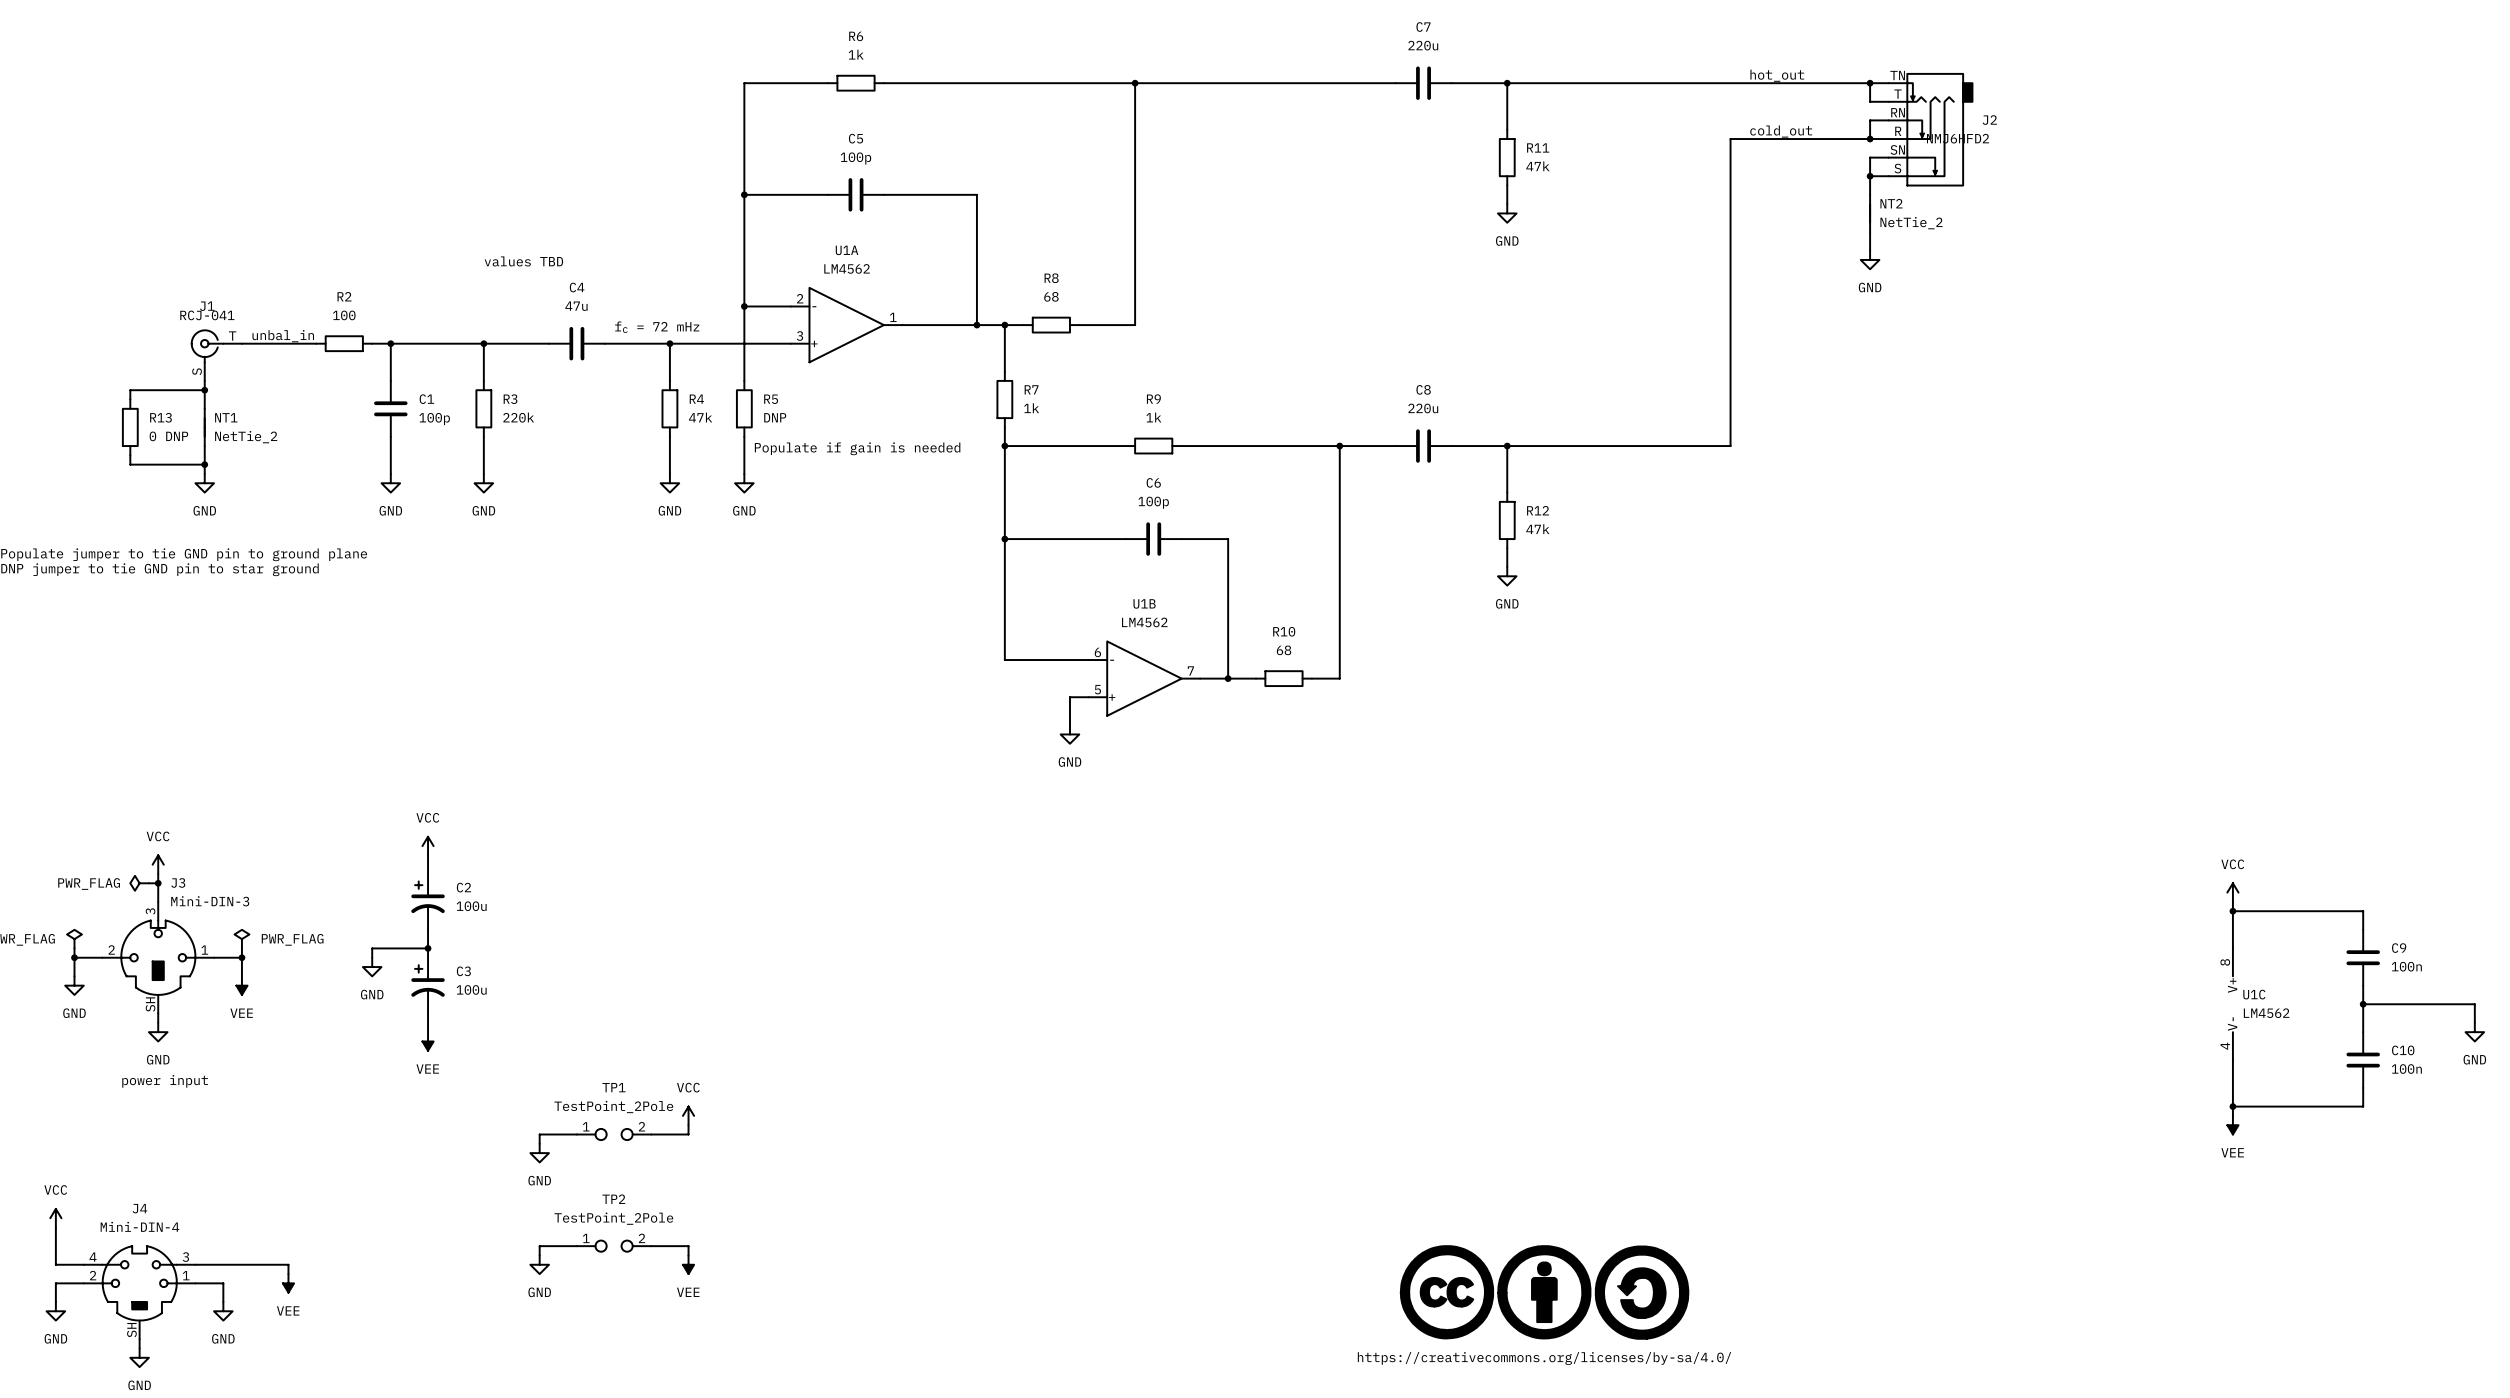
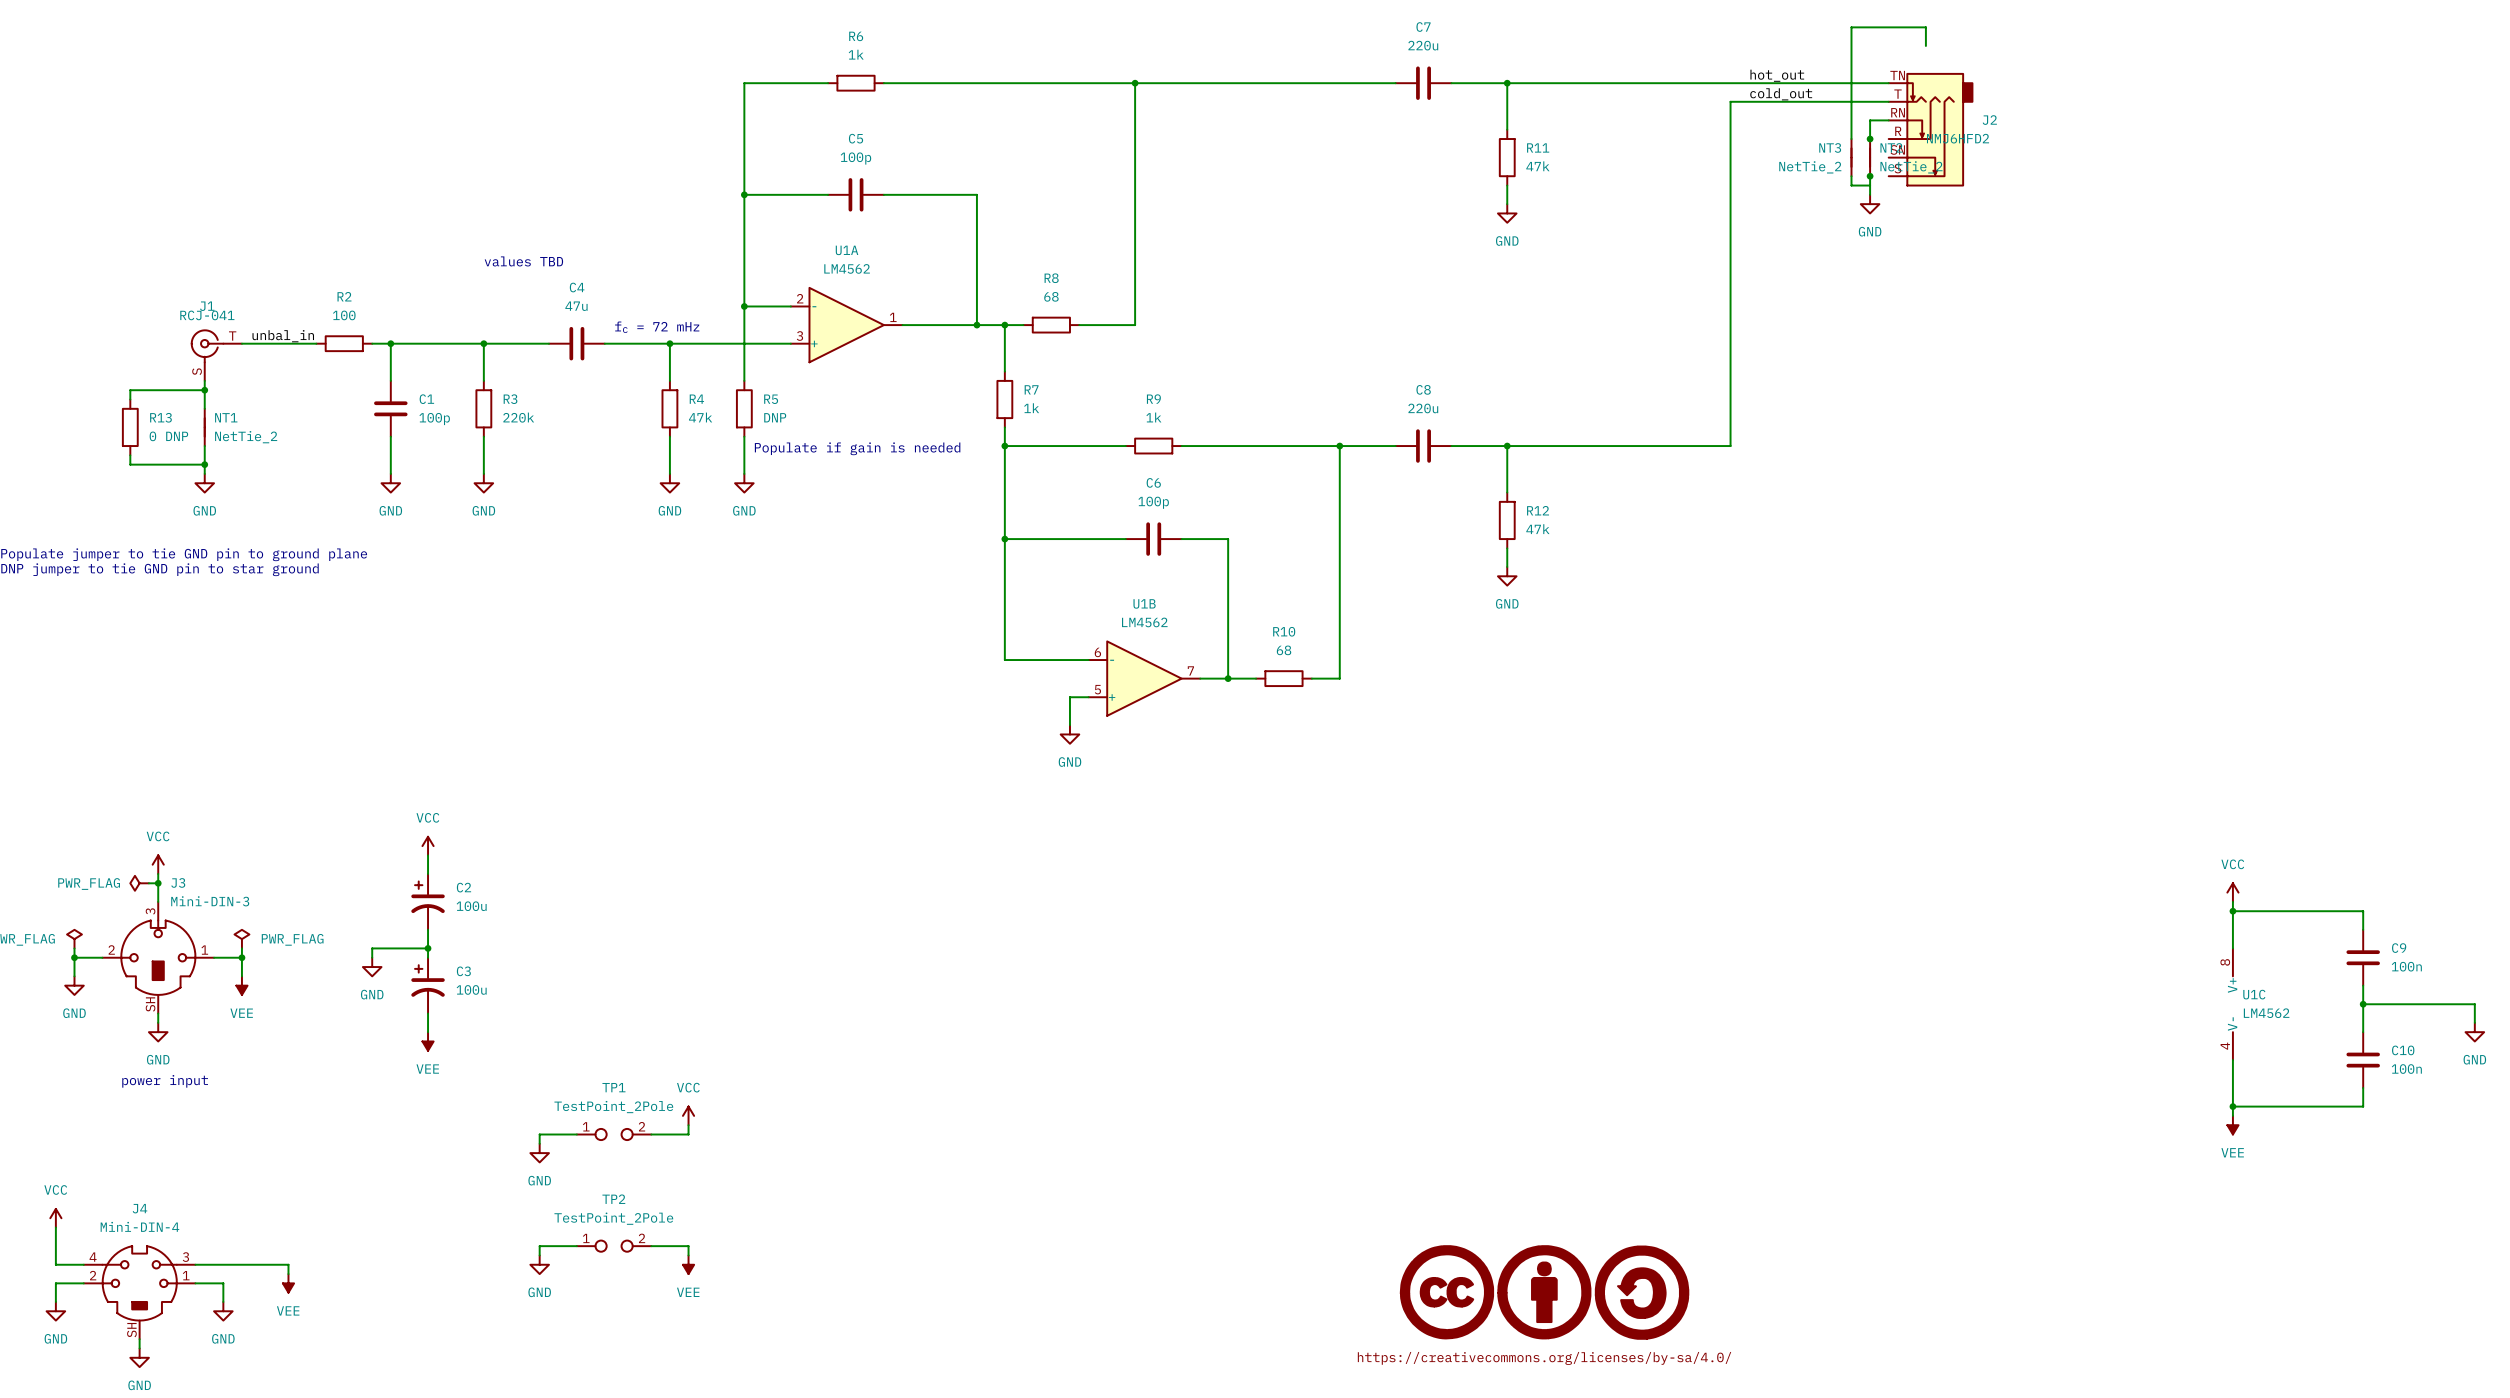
wire: none -> (1925, 45) (1925, 27) (1851, 27) (1851, 139)
wire: (1870, 83) (1870, 101) -> none
junction: (1870, 83) -> none
label position: cold_out (1781, 131) -> cold_out (1781, 94)
wire: (1730, 139) (1888, 139) -> (1730, 139) (1730, 101) (1870, 101)
NT3: none -> NetTie_2 (1851, 157)
wire: (1888, 157) (1870, 157) (1870, 176) (1888, 176) -> none
wire: none -> (1851, 176) (1851, 185) (1870, 185)
NT2 position: (1870, 213) -> (1870, 157)
wire: (1870, 232) (1870, 250) -> none
power symbol position: GND (1870, 259) -> GND (1870, 204)

